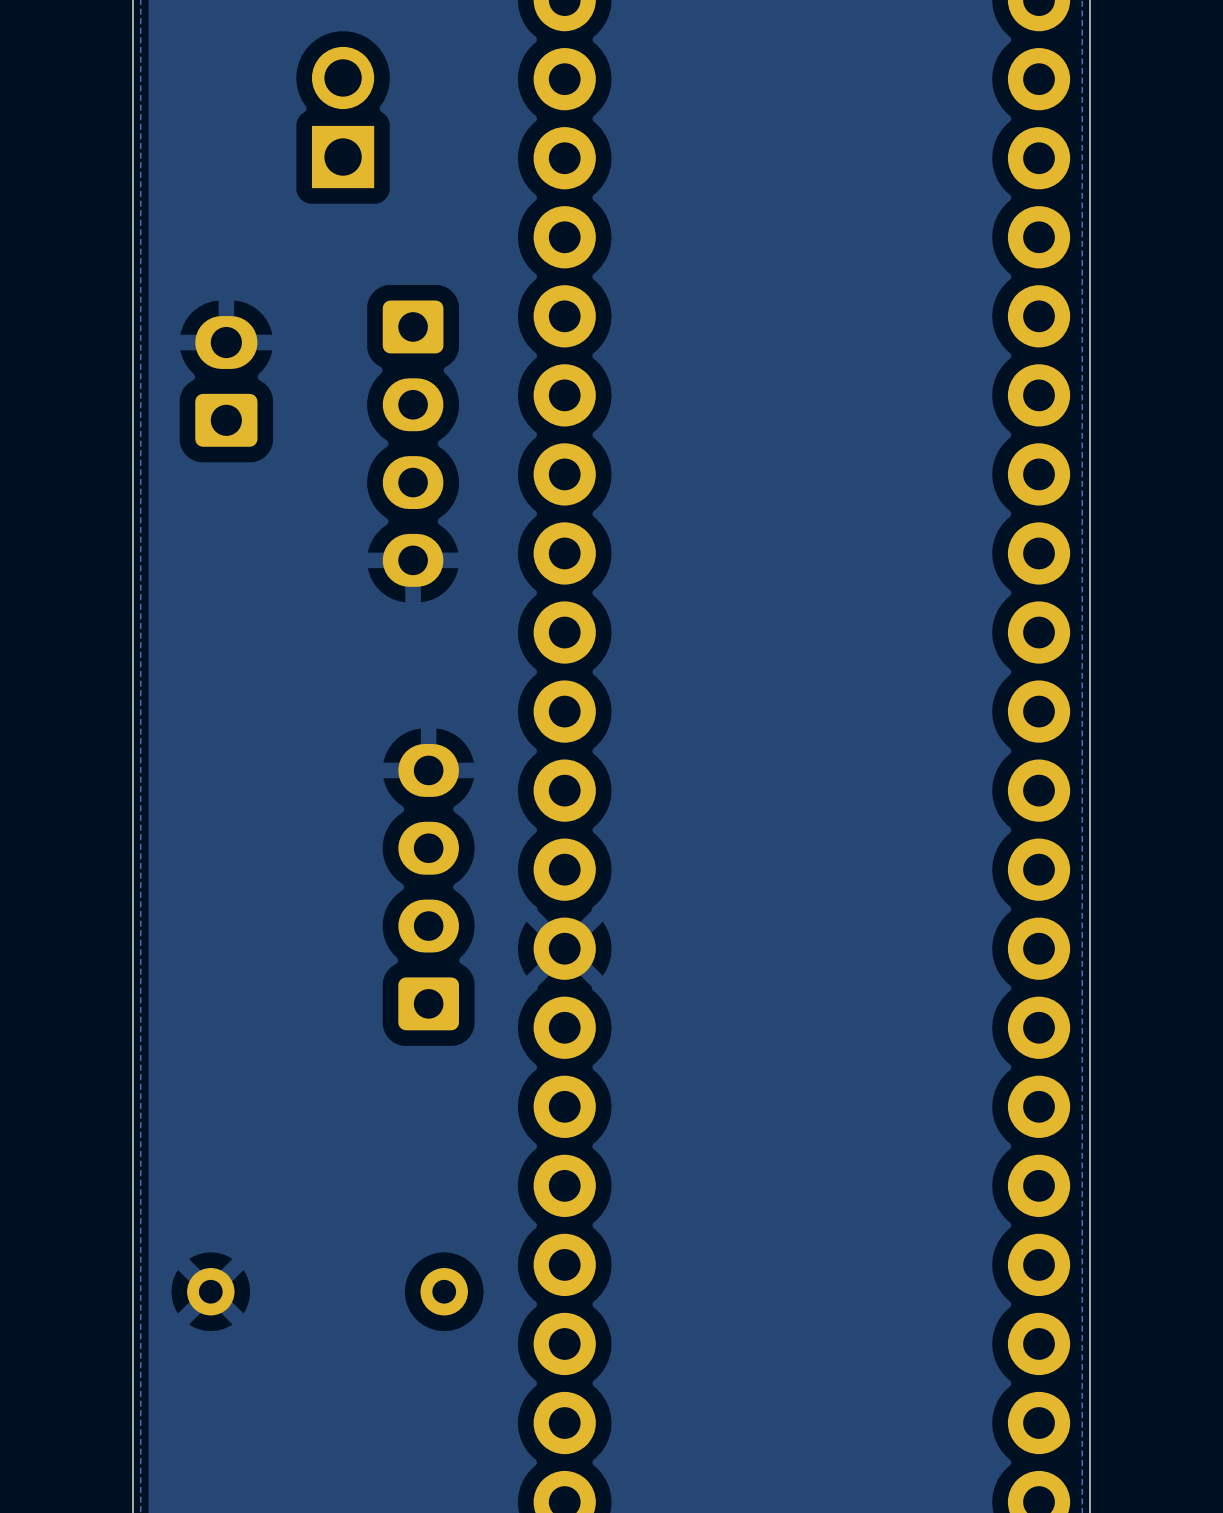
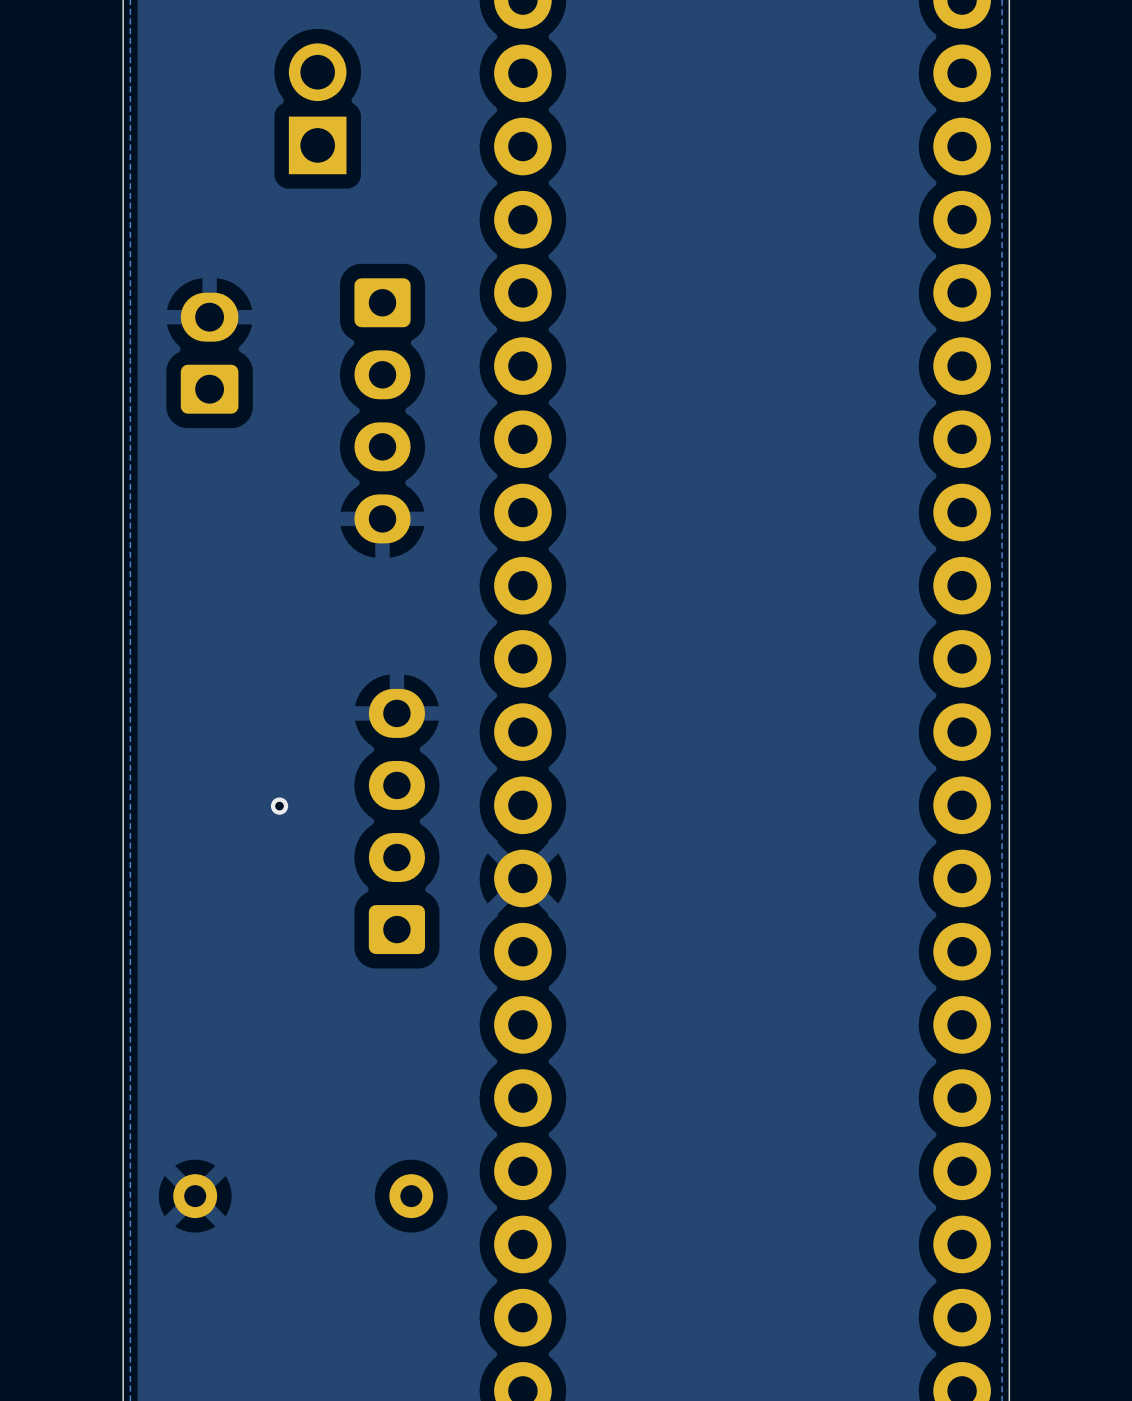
via: none -> (279, 806)

